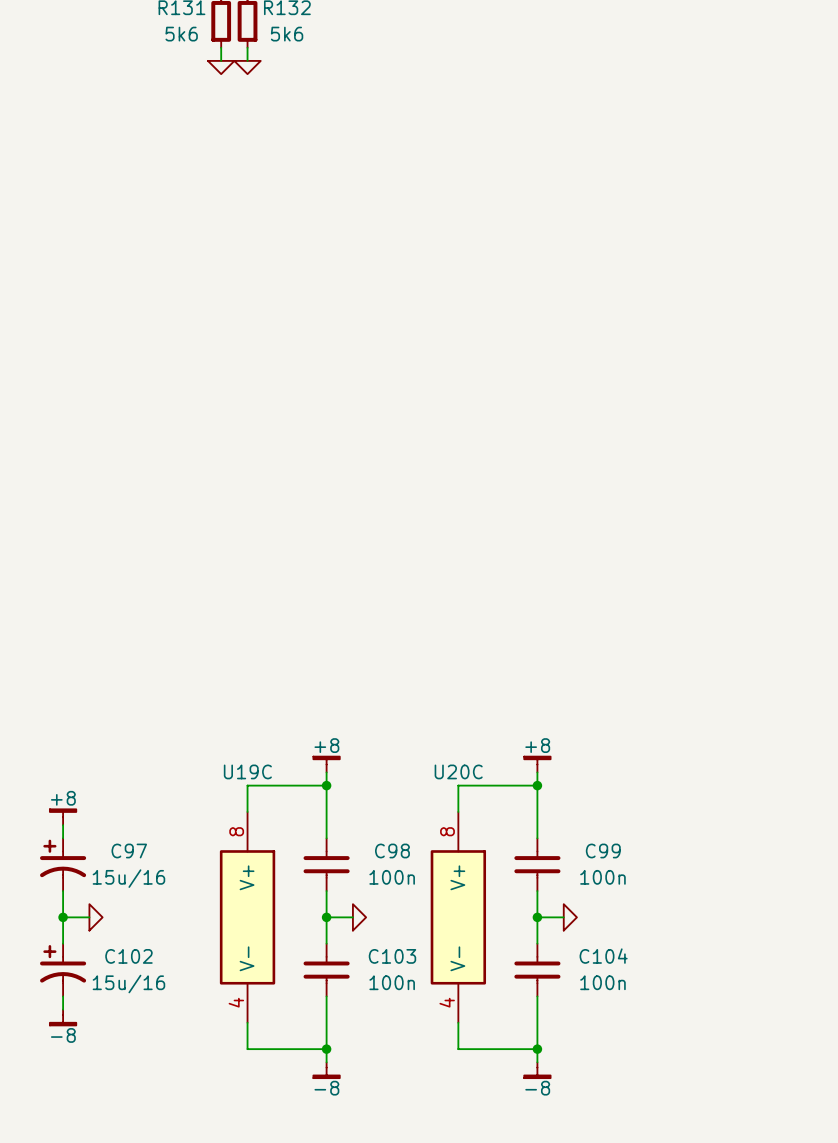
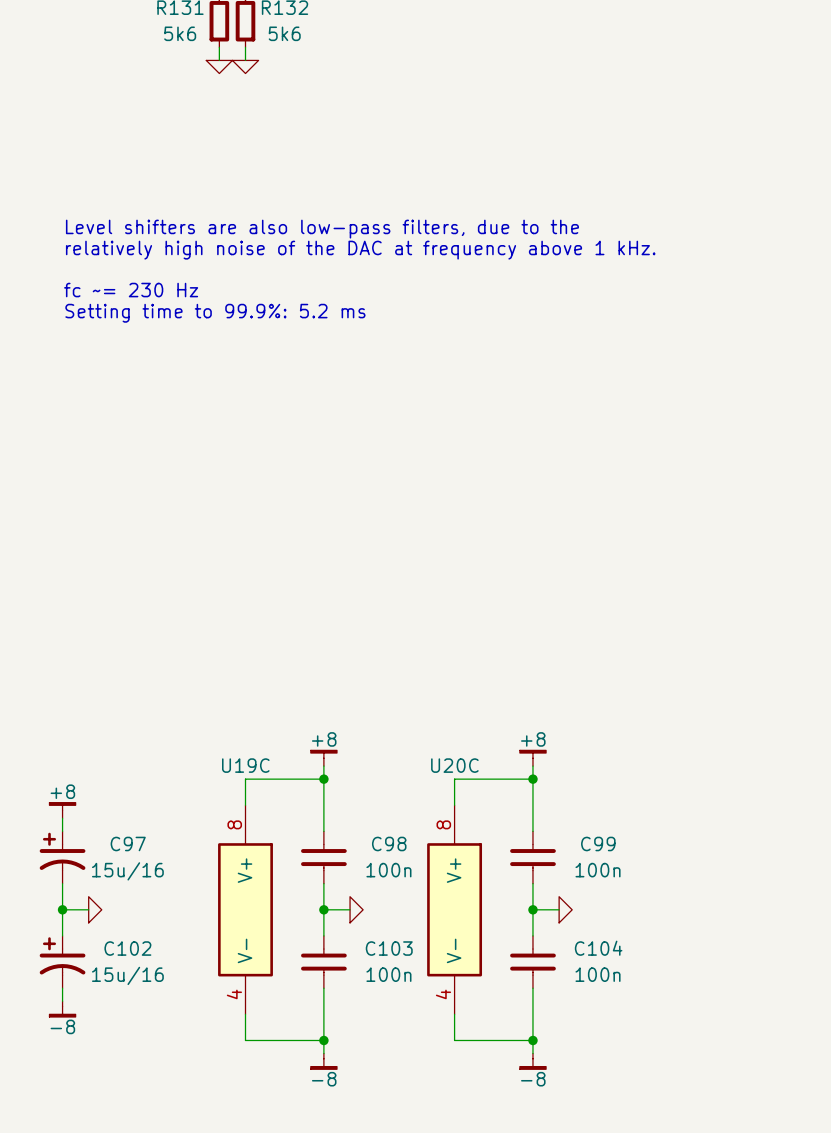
text: none -> Level shifters are also low-pass filters, due to the (322, 229)
text: none -> relatively high noise of the DAC at frequency above 1 kHz. (360, 250)
text: none -> fc ~= 230 Hz (131, 290)
text: none -> Setting time to 99.9%: 5.2 ms (215, 313)

